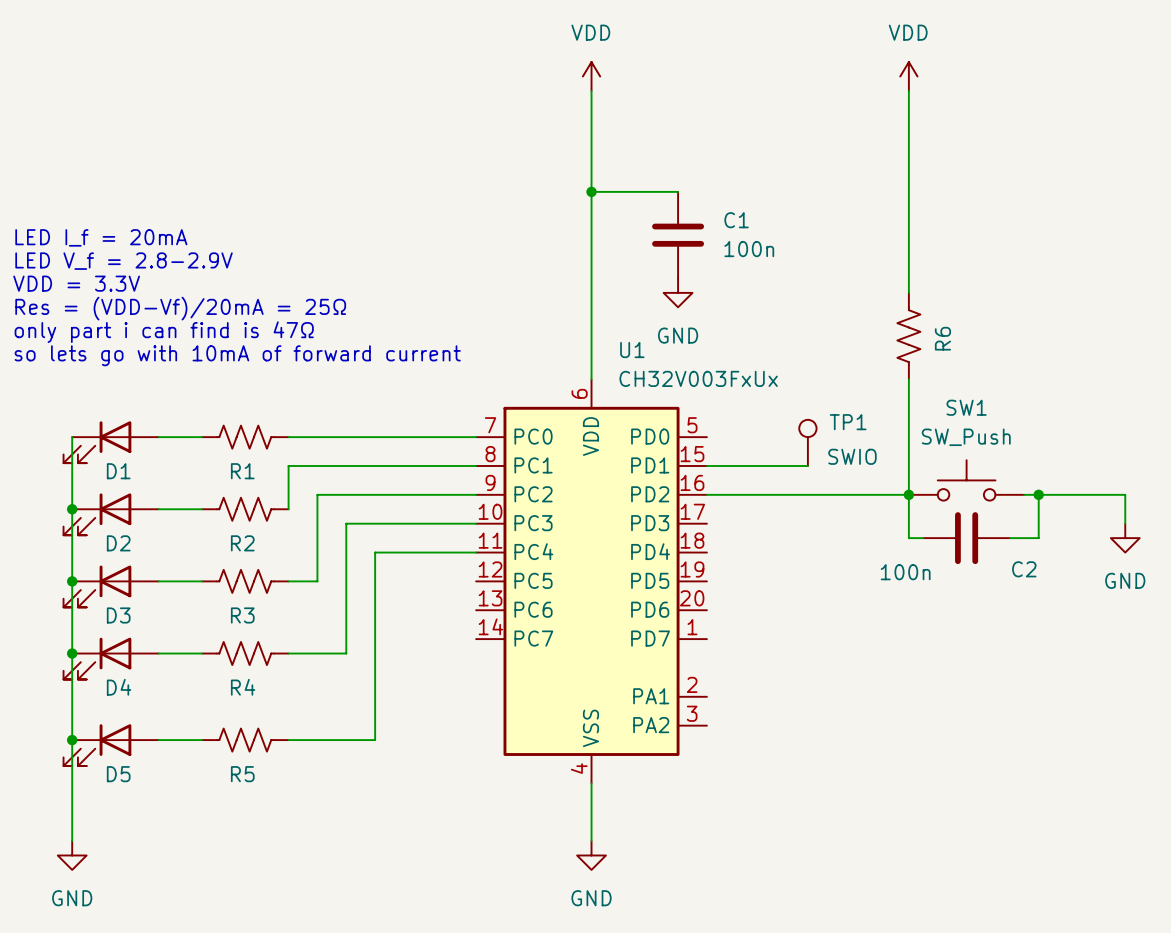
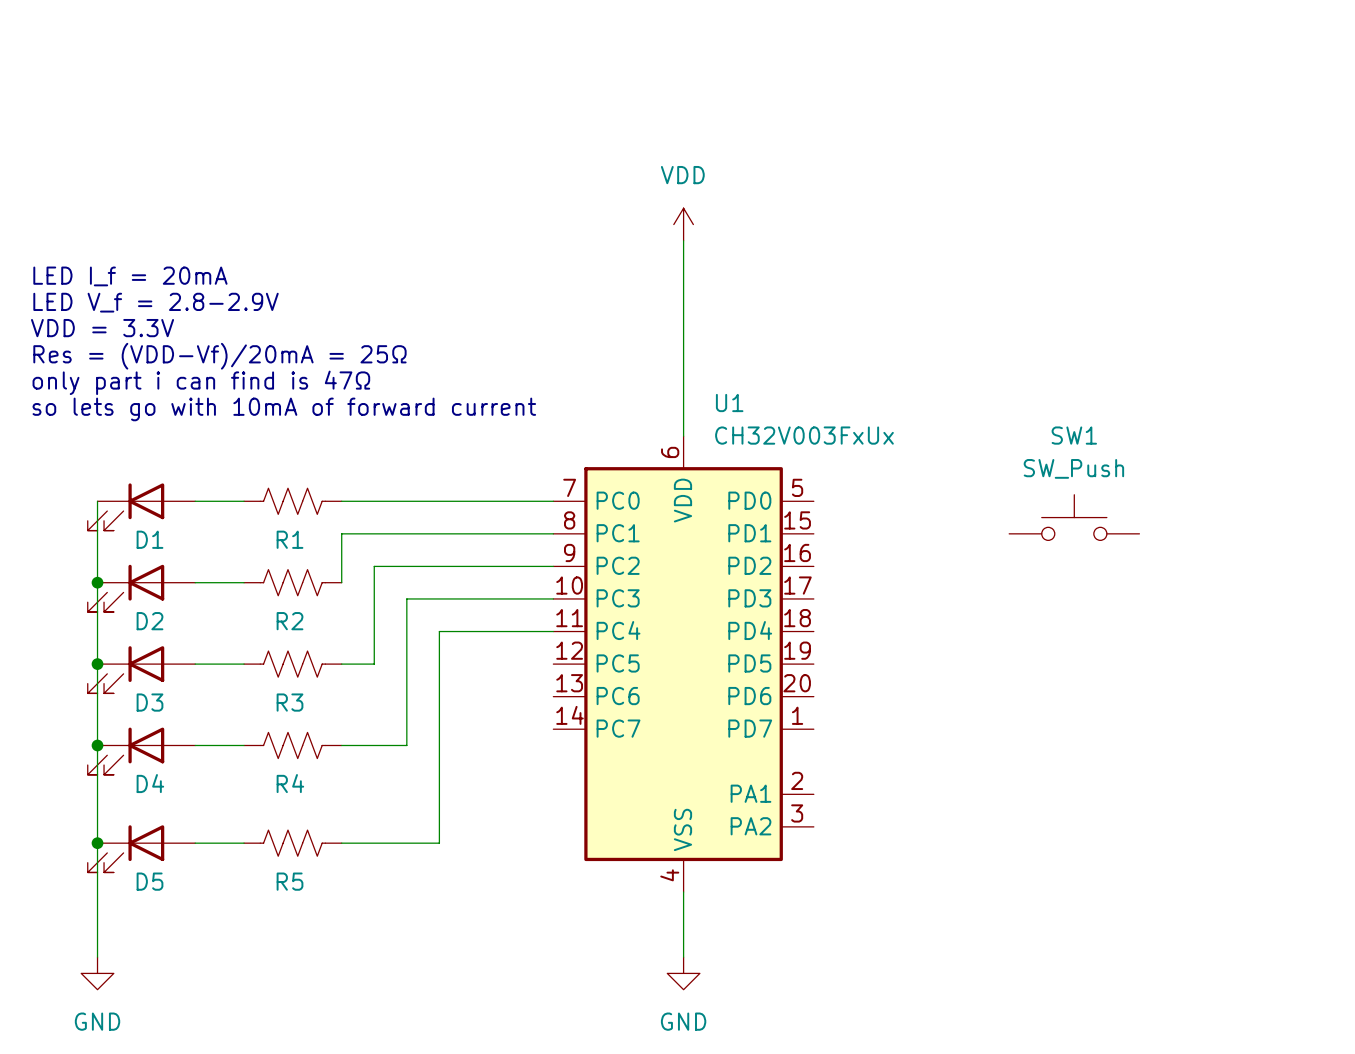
power symbol position: VDD (591, 76) -> VDD (683, 224)
power symbol: VDD (908, 76) -> none
wire: (591, 90) (591, 206) -> none
wire: (908, 90) (908, 292) -> none
wire: (591, 191) (678, 191) -> none
junction: (591, 191) -> none
C1: 100n (678, 235) -> none
power symbol: GND (678, 292) -> none
R6: (908, 336) -> none
wire: (908, 379) (908, 538) (923, 538) -> none
TP1: SWIO (807, 442) -> none
wire: (706, 465) (807, 465) -> none
SW1 position: (966, 480) -> (1074, 517)
wire: (706, 494) (908, 494) -> none
junction: (908, 494) -> none
wire: (1024, 494) (1125, 494) (1125, 523) -> none
wire: (1038, 494) (1038, 538) (1009, 538) -> none
junction: (1038, 494) -> none
C2: 100n (966, 538) -> none
power symbol: GND (1125, 538) -> none

